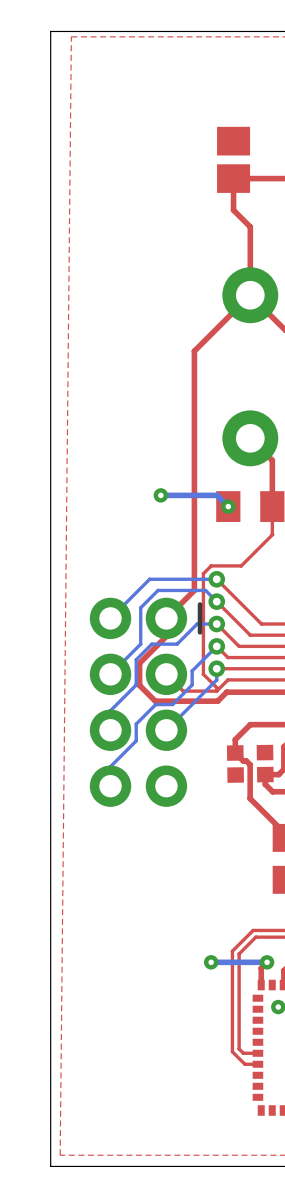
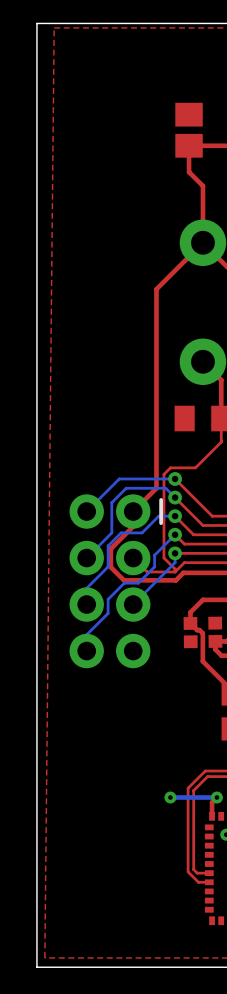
bottom track: (160, 495) (217, 495) (228, 506) -> none
via: (160, 495) -> none
via: (228, 506) -> none

